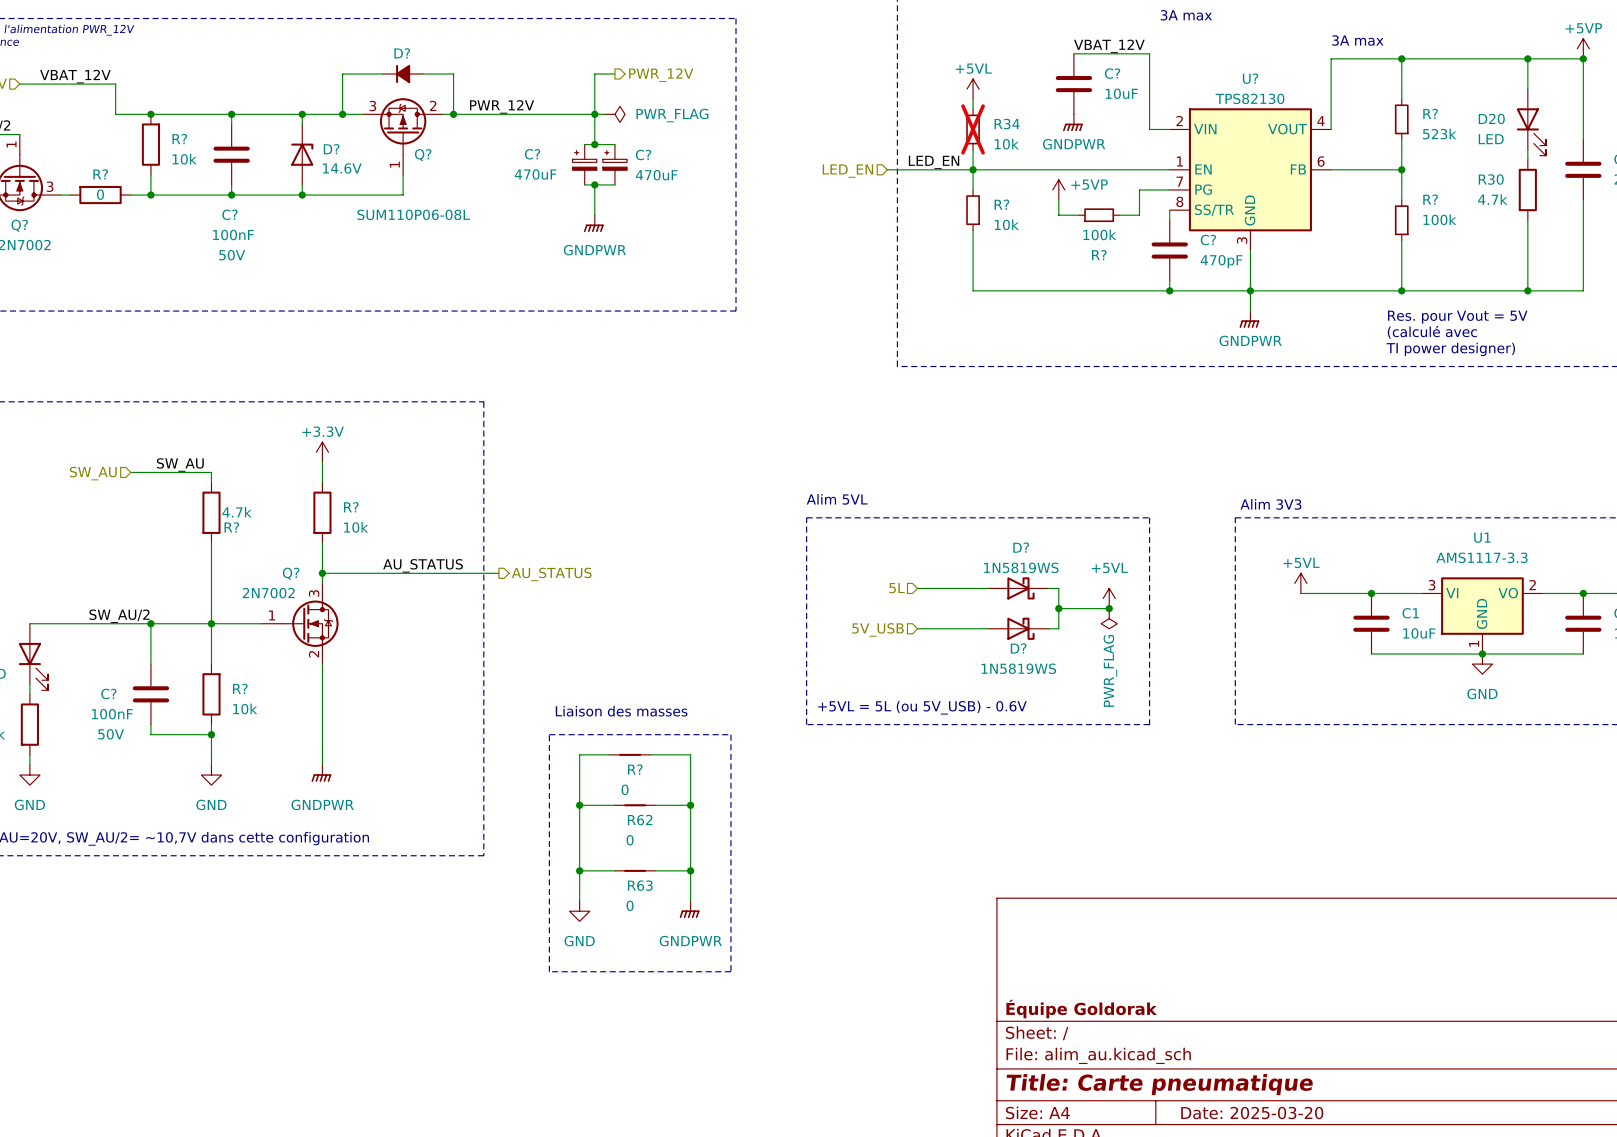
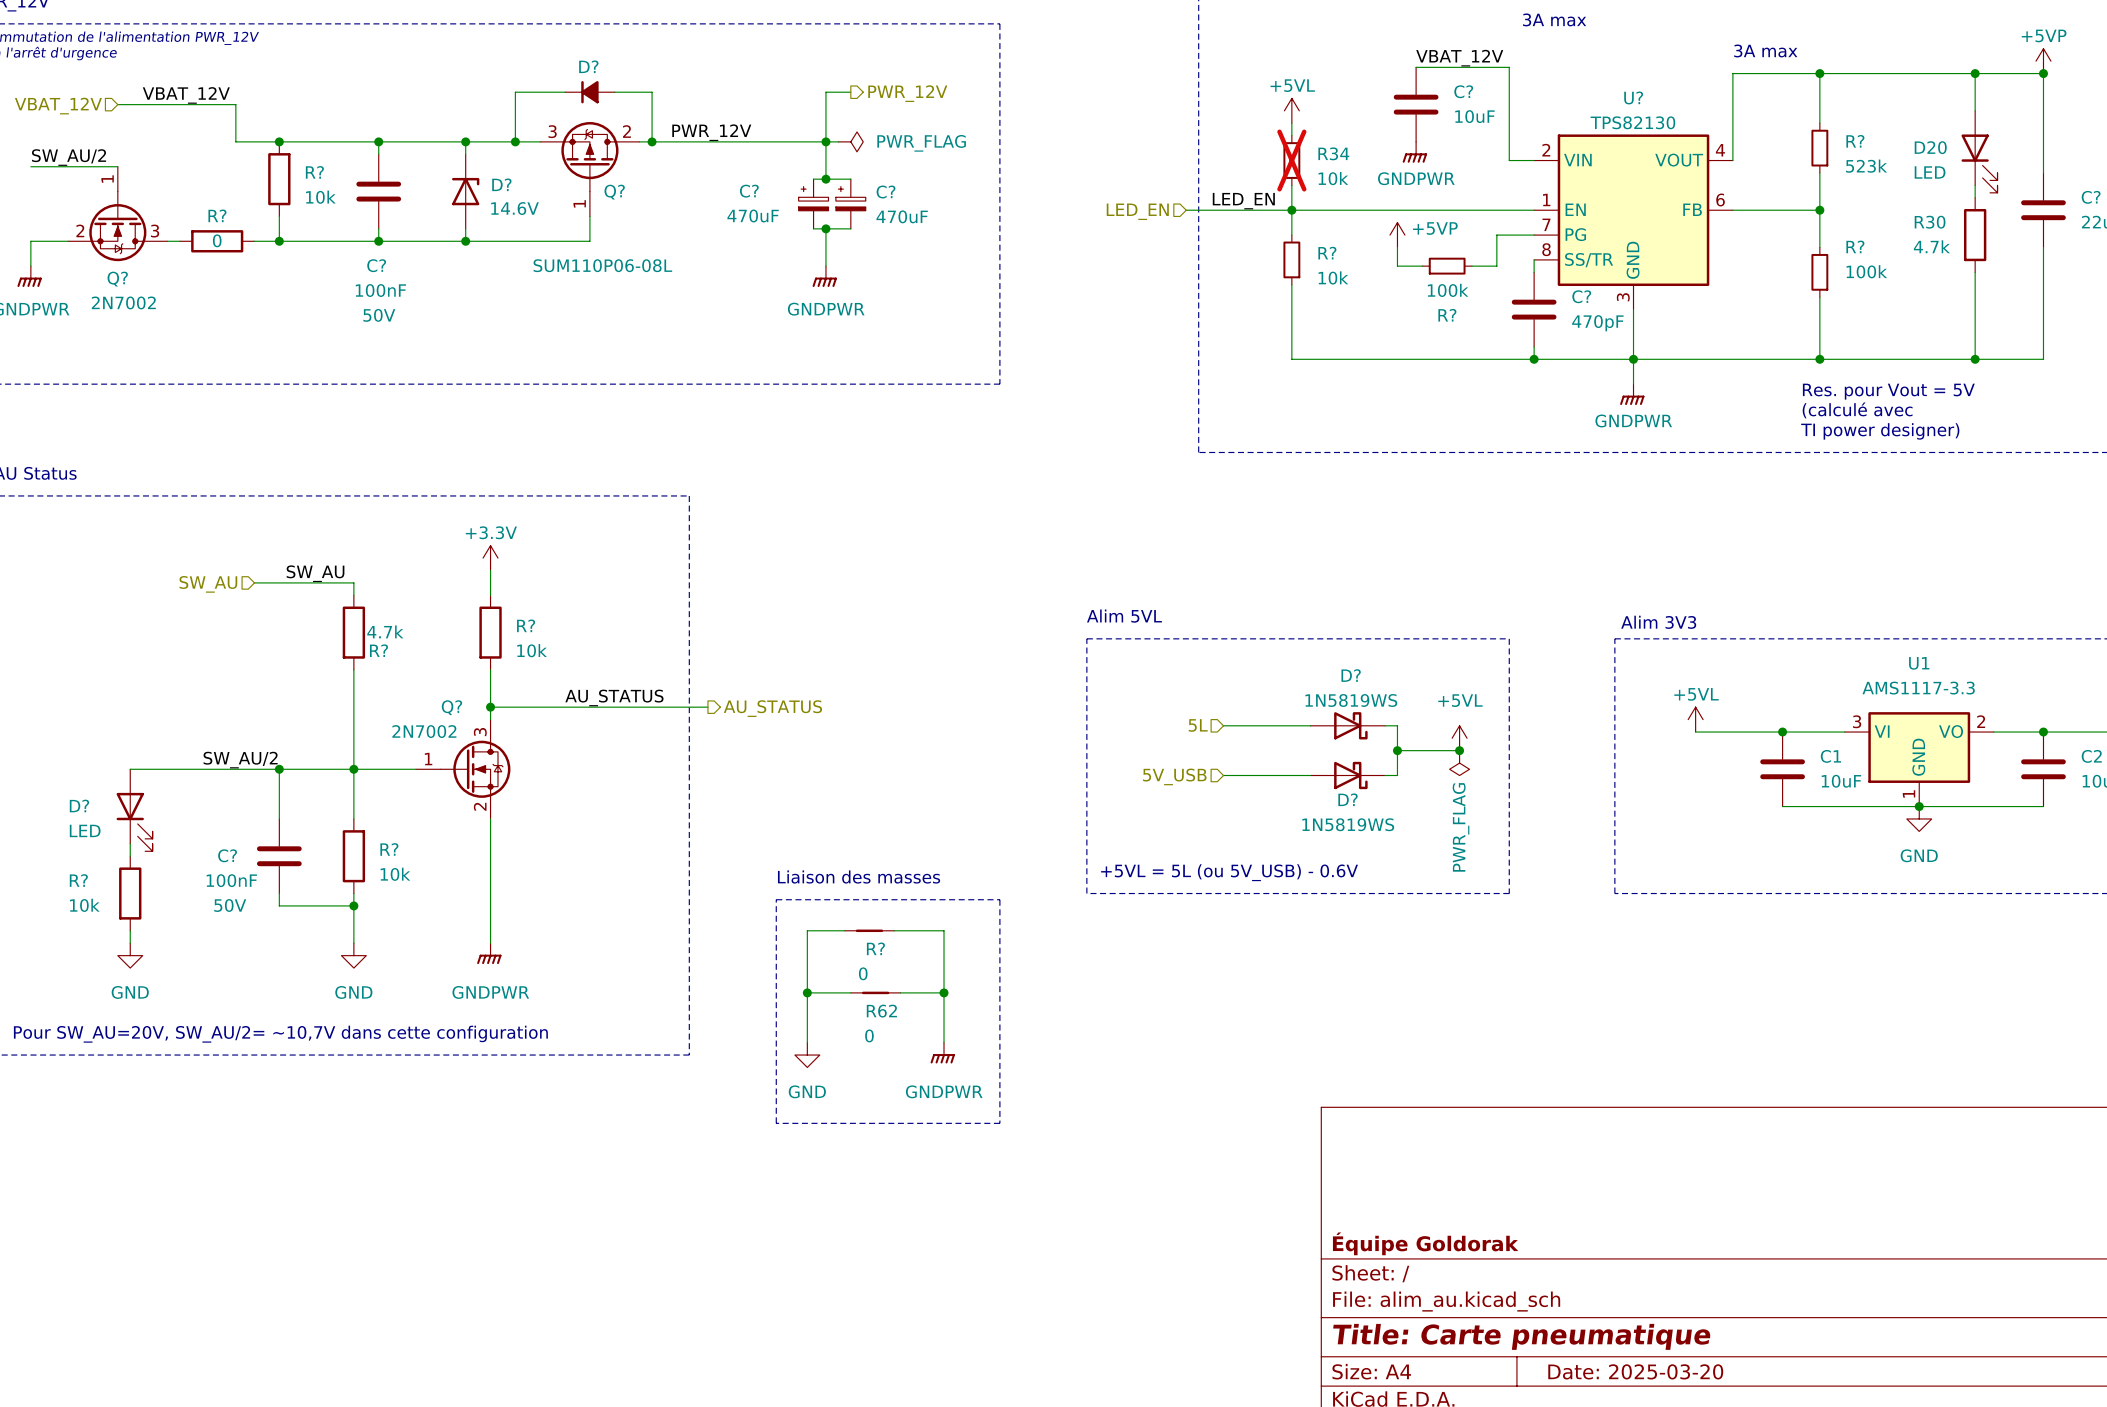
line: (549, 734) (730, 734) (730, 971) (549, 971) (549, 734) -> (776, 899) (776, 1123) (999, 1123) (999, 899) (776, 899)
wire: (579, 845) (579, 901) -> none
wire: (690, 845) (690, 901) -> none
wire: (579, 870) (614, 870) -> none
junction: (579, 870) -> none
R63: 0 (635, 870) -> none
wire: (655, 870) (690, 870) -> none
junction: (690, 870) -> none
power symbol position: GNDPWR (689, 909) -> GNDPWR (942, 1053)
power symbol position: GND (579, 911) -> GND (807, 1055)

